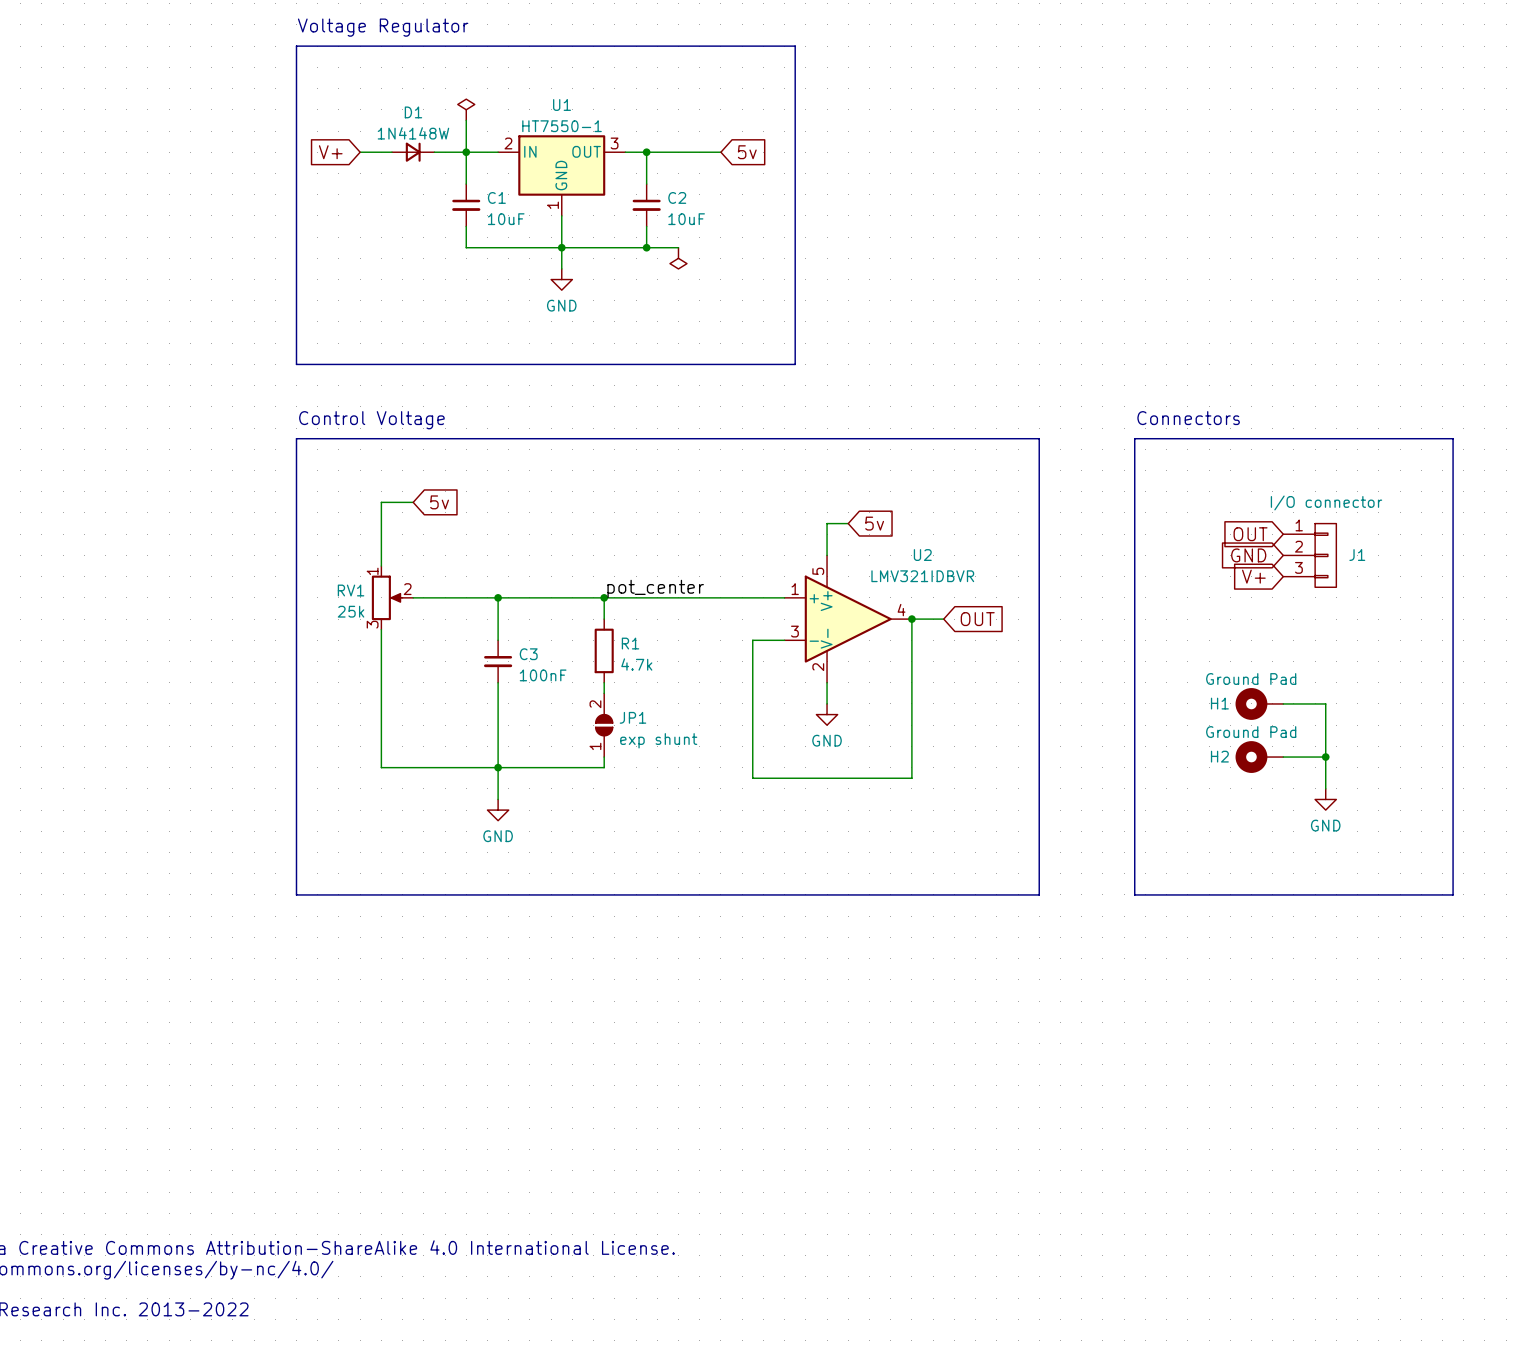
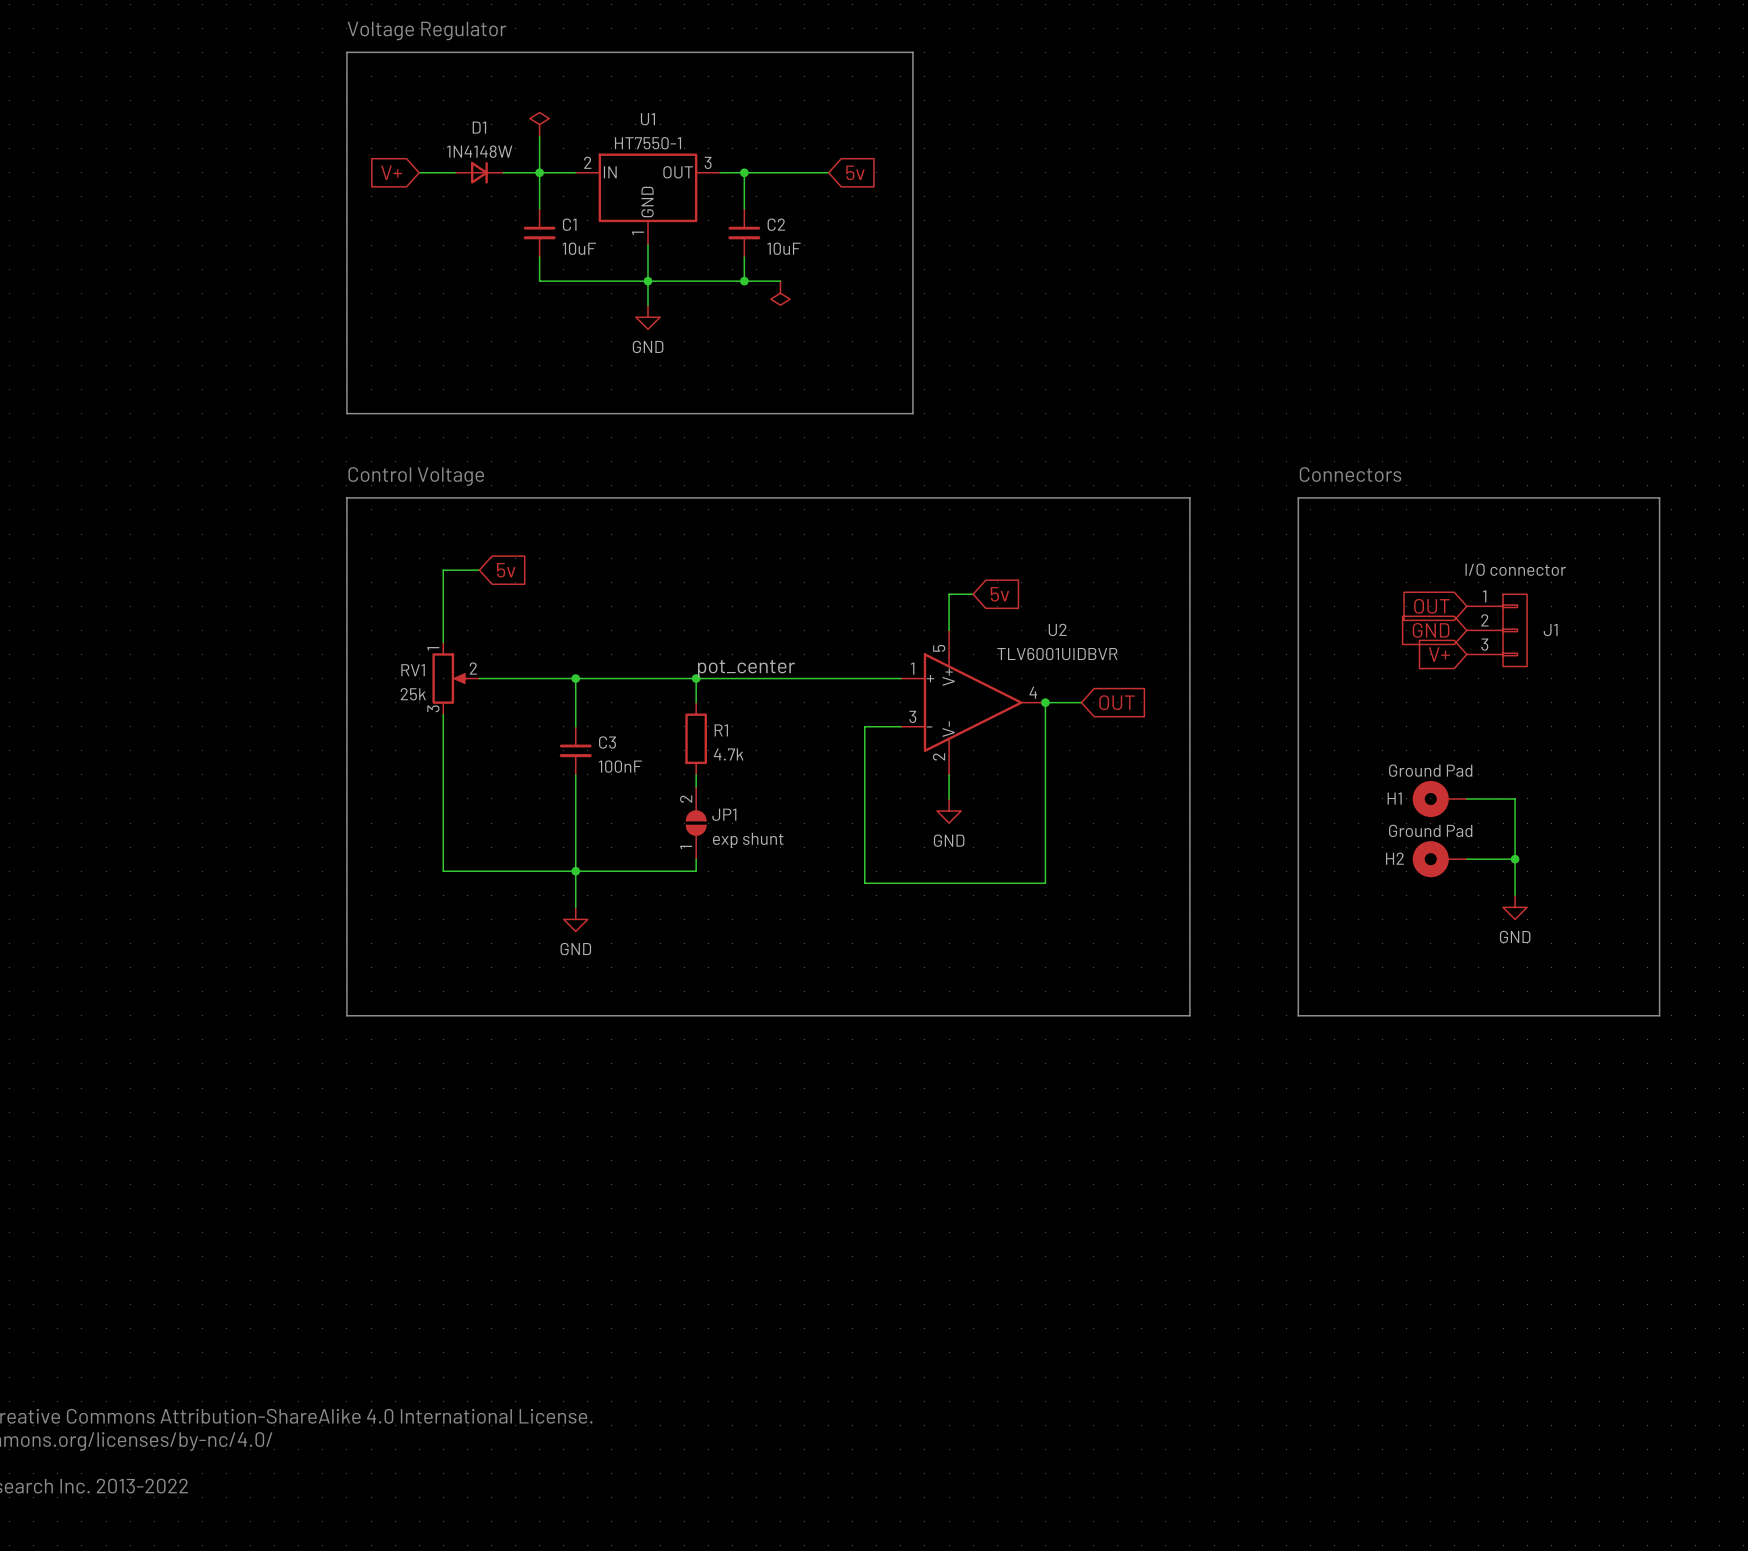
U2 value: LMV321IDBVR (922, 576) -> TLV6001UIDBVR (1057, 654)

